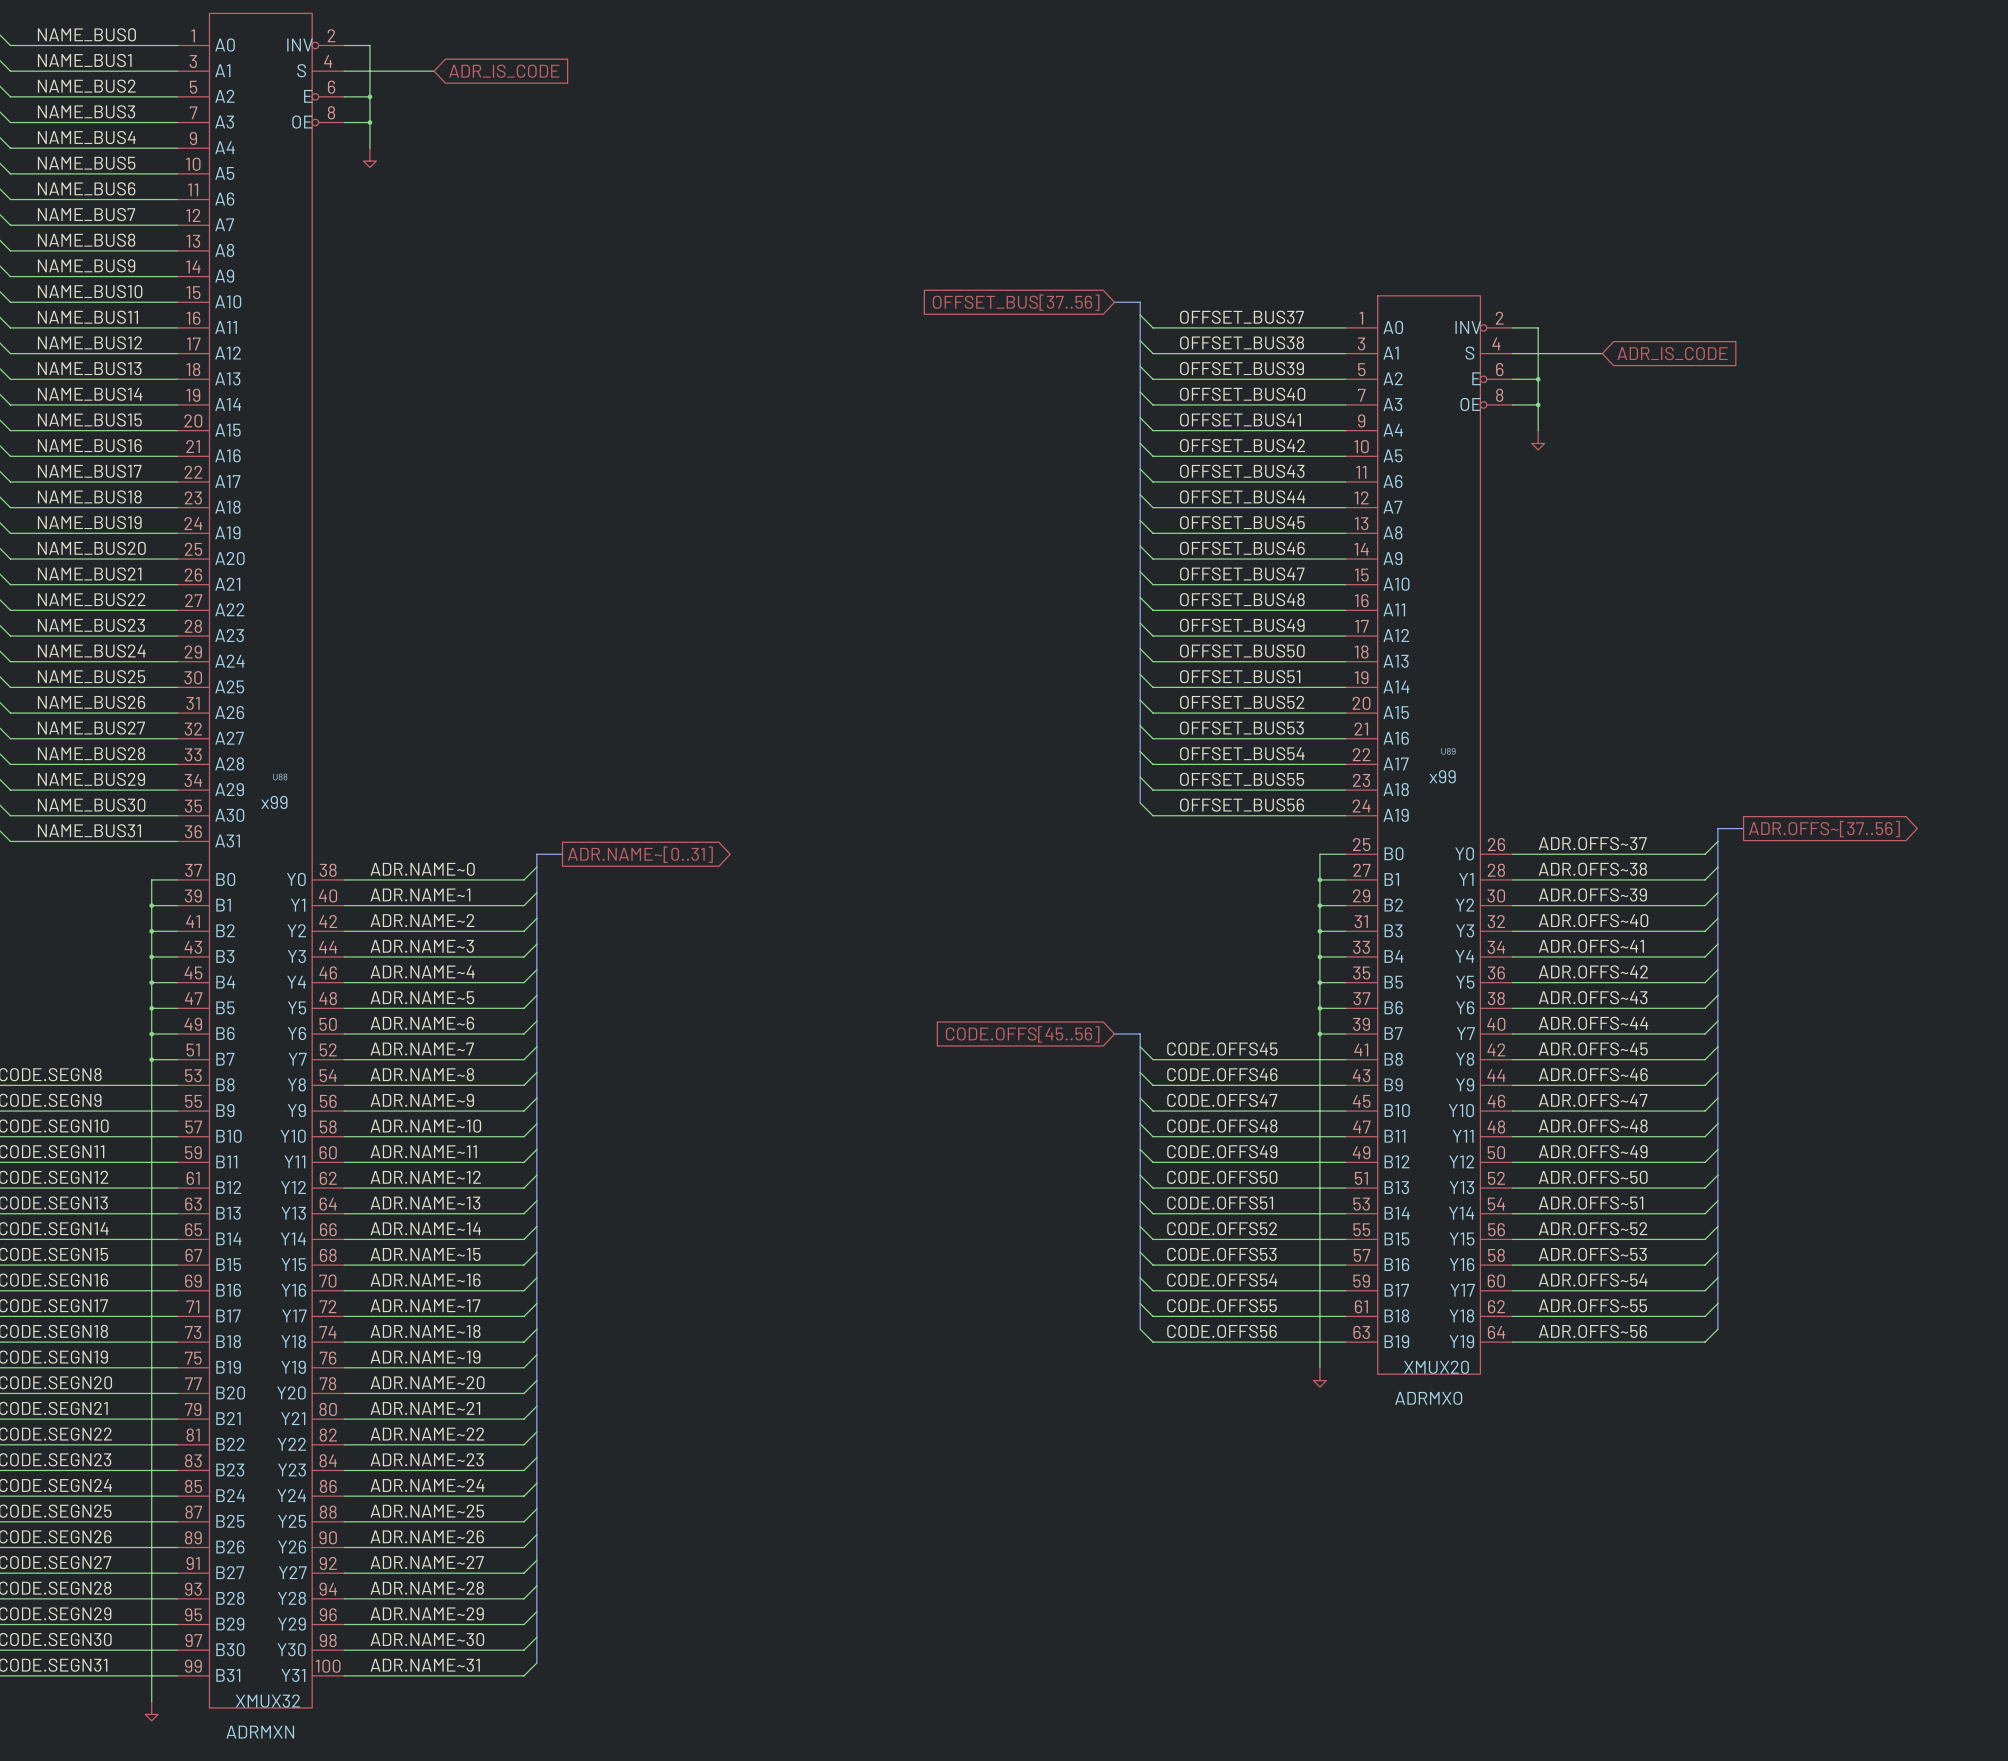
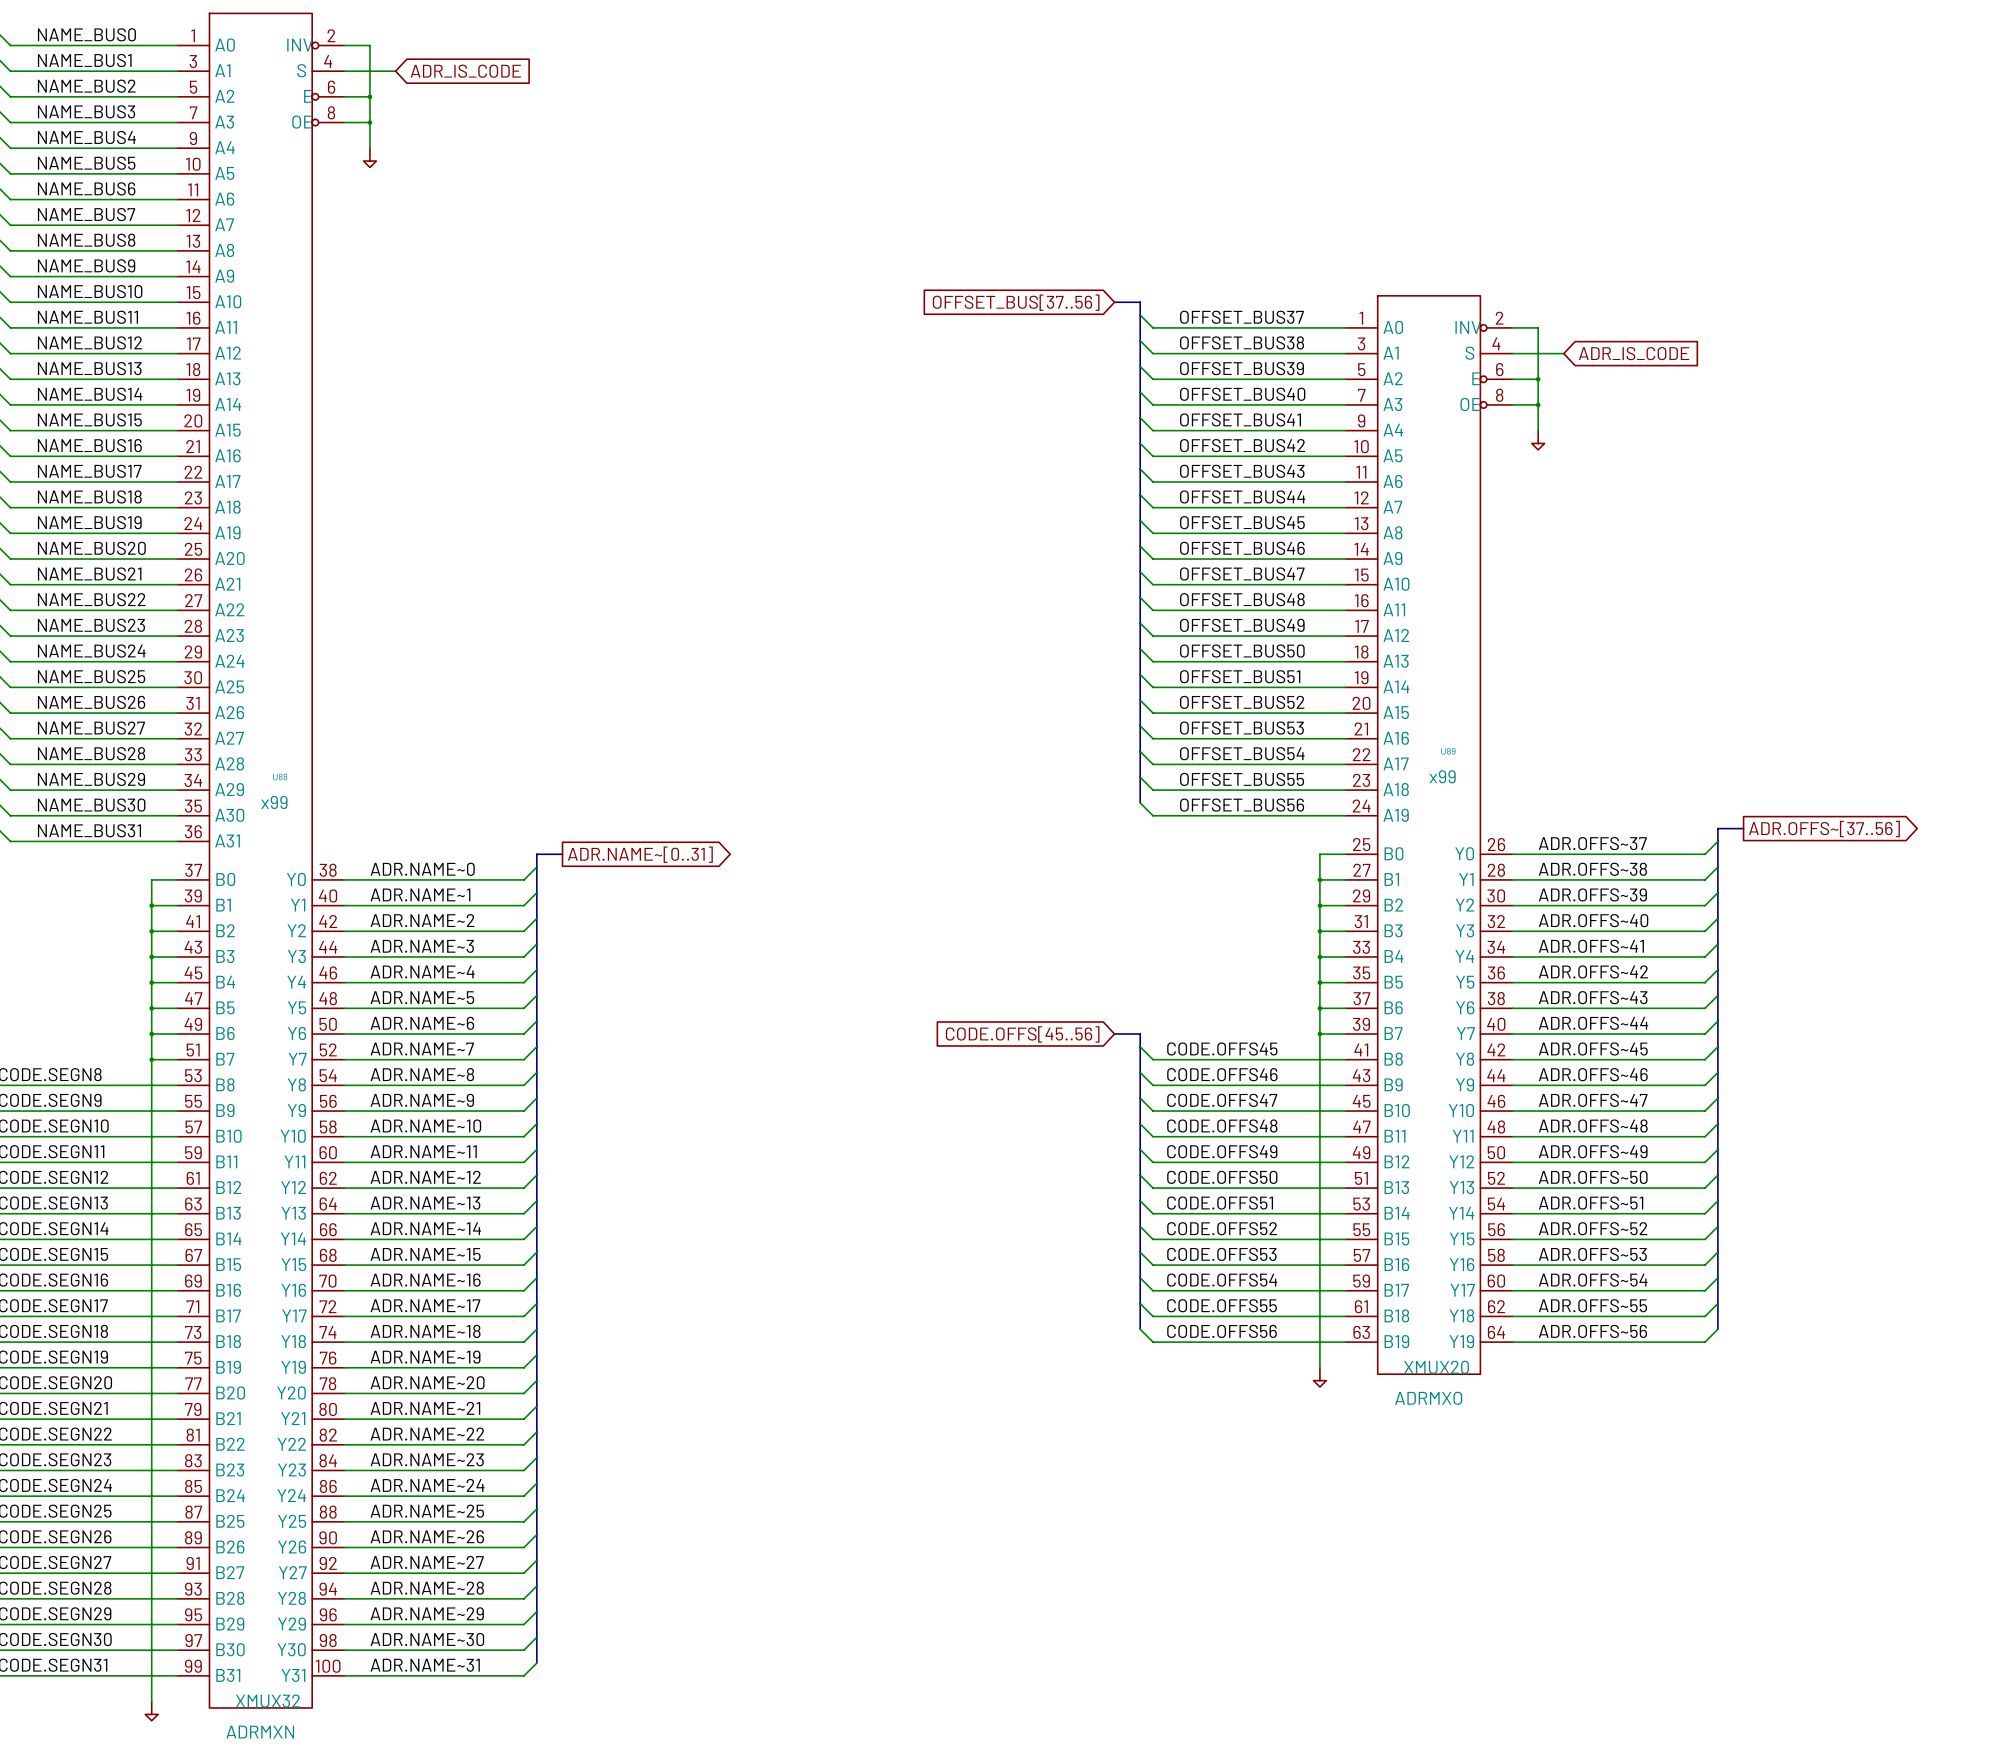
wire: (395, 71) (434, 71) -> none
global label position: ADR_IS_CODE (504, 71) -> ADR_IS_CODE (465, 71)
wire: (1563, 353) (1602, 353) -> none
global label position: ADR_IS_CODE (1672, 353) -> ADR_IS_CODE (1633, 353)

